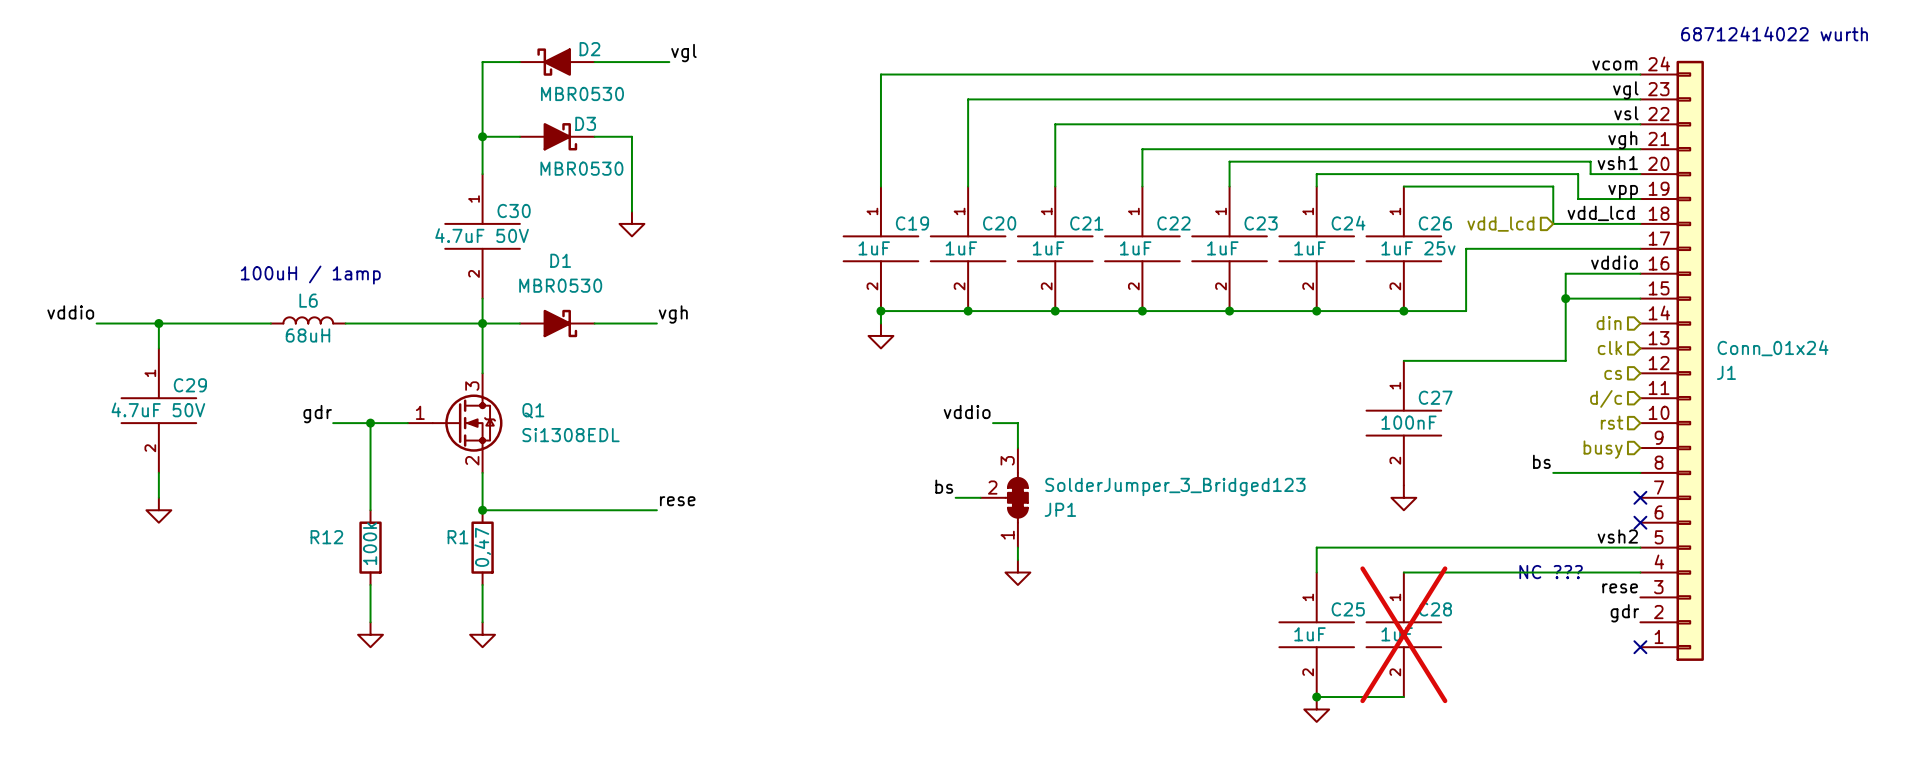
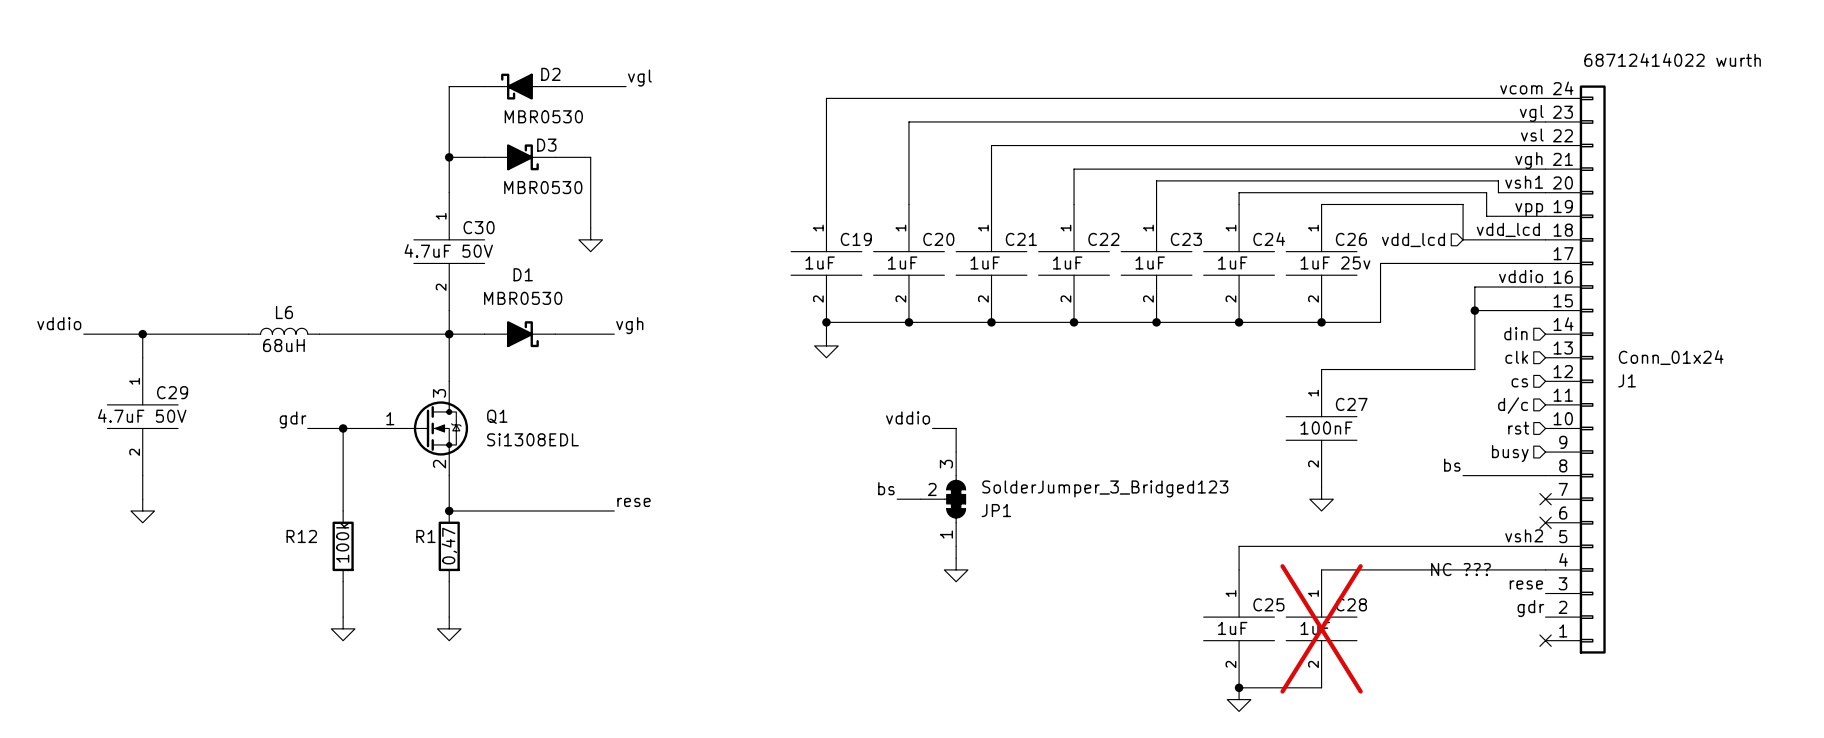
text: 100uH / 1amp (310, 275) -> none

